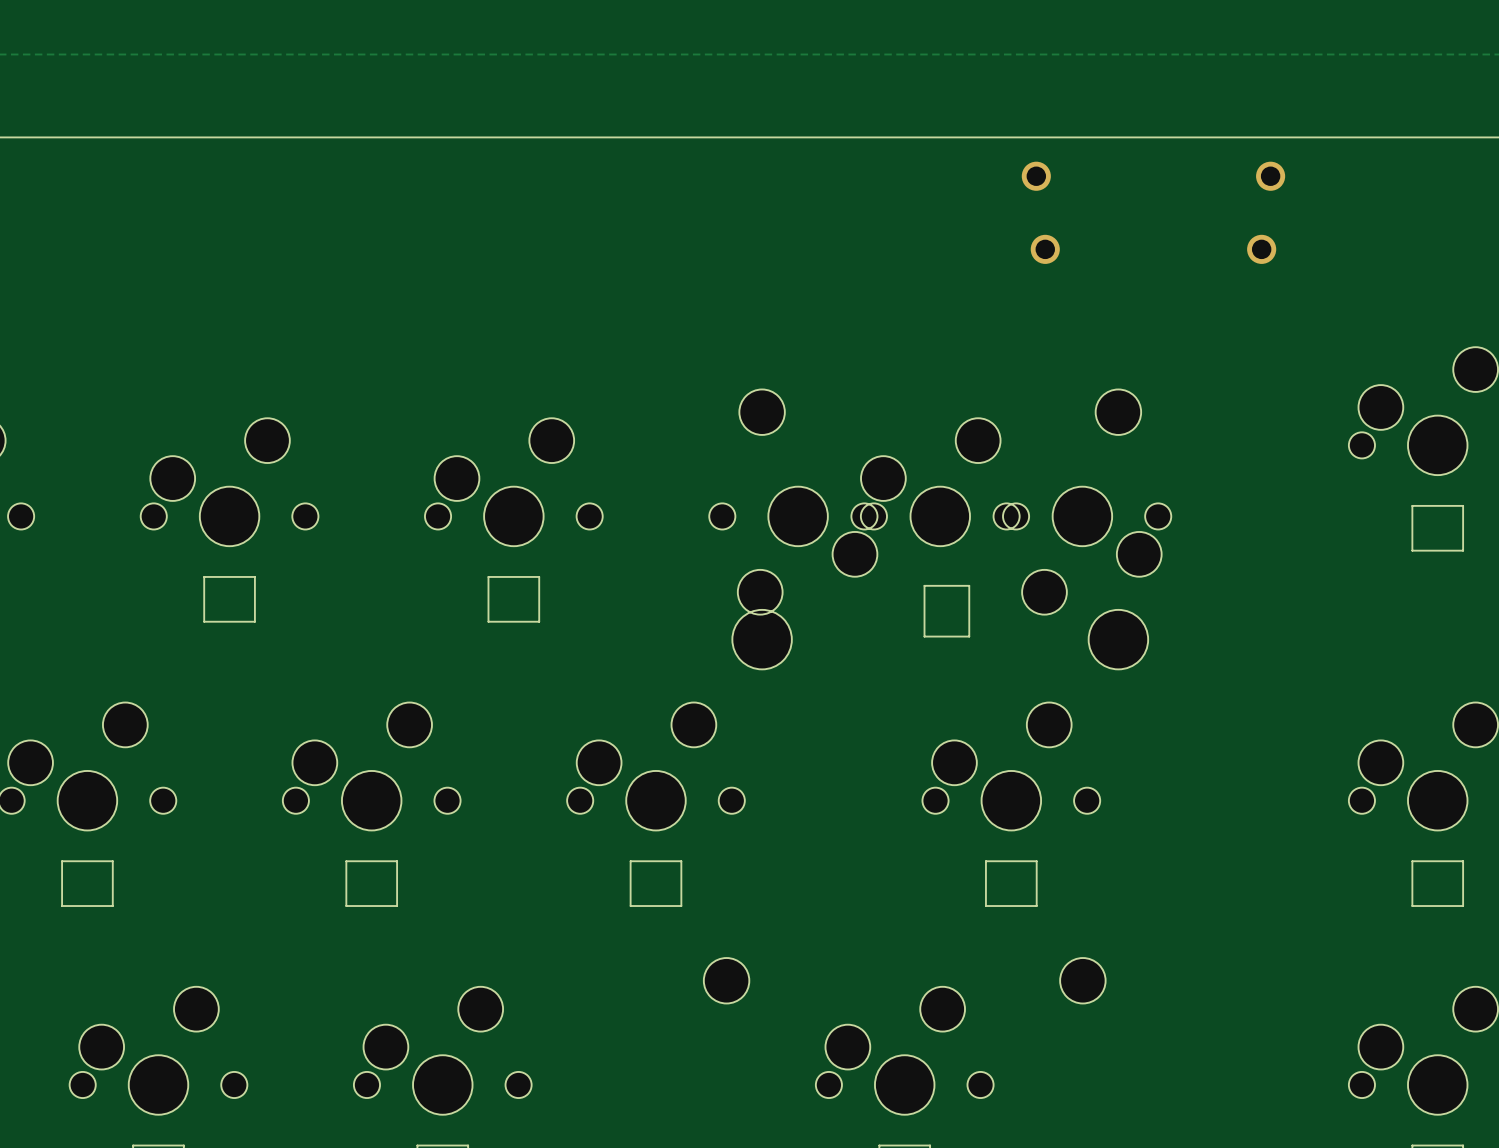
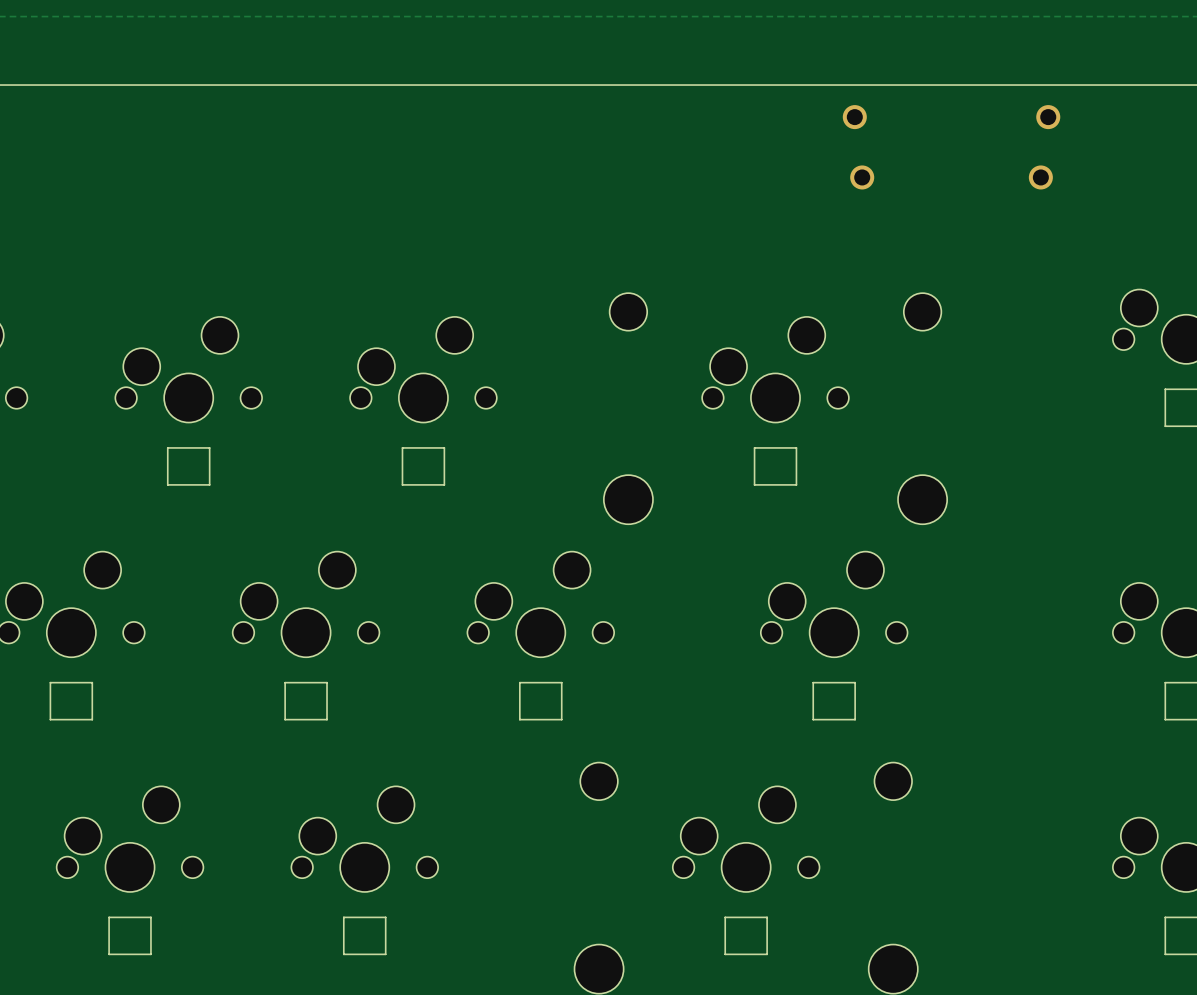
part: (798, 550) -> none
part: (1082, 550) -> none
part rotation: 0° (946, 611) -> 90° clockwise (775, 466)

